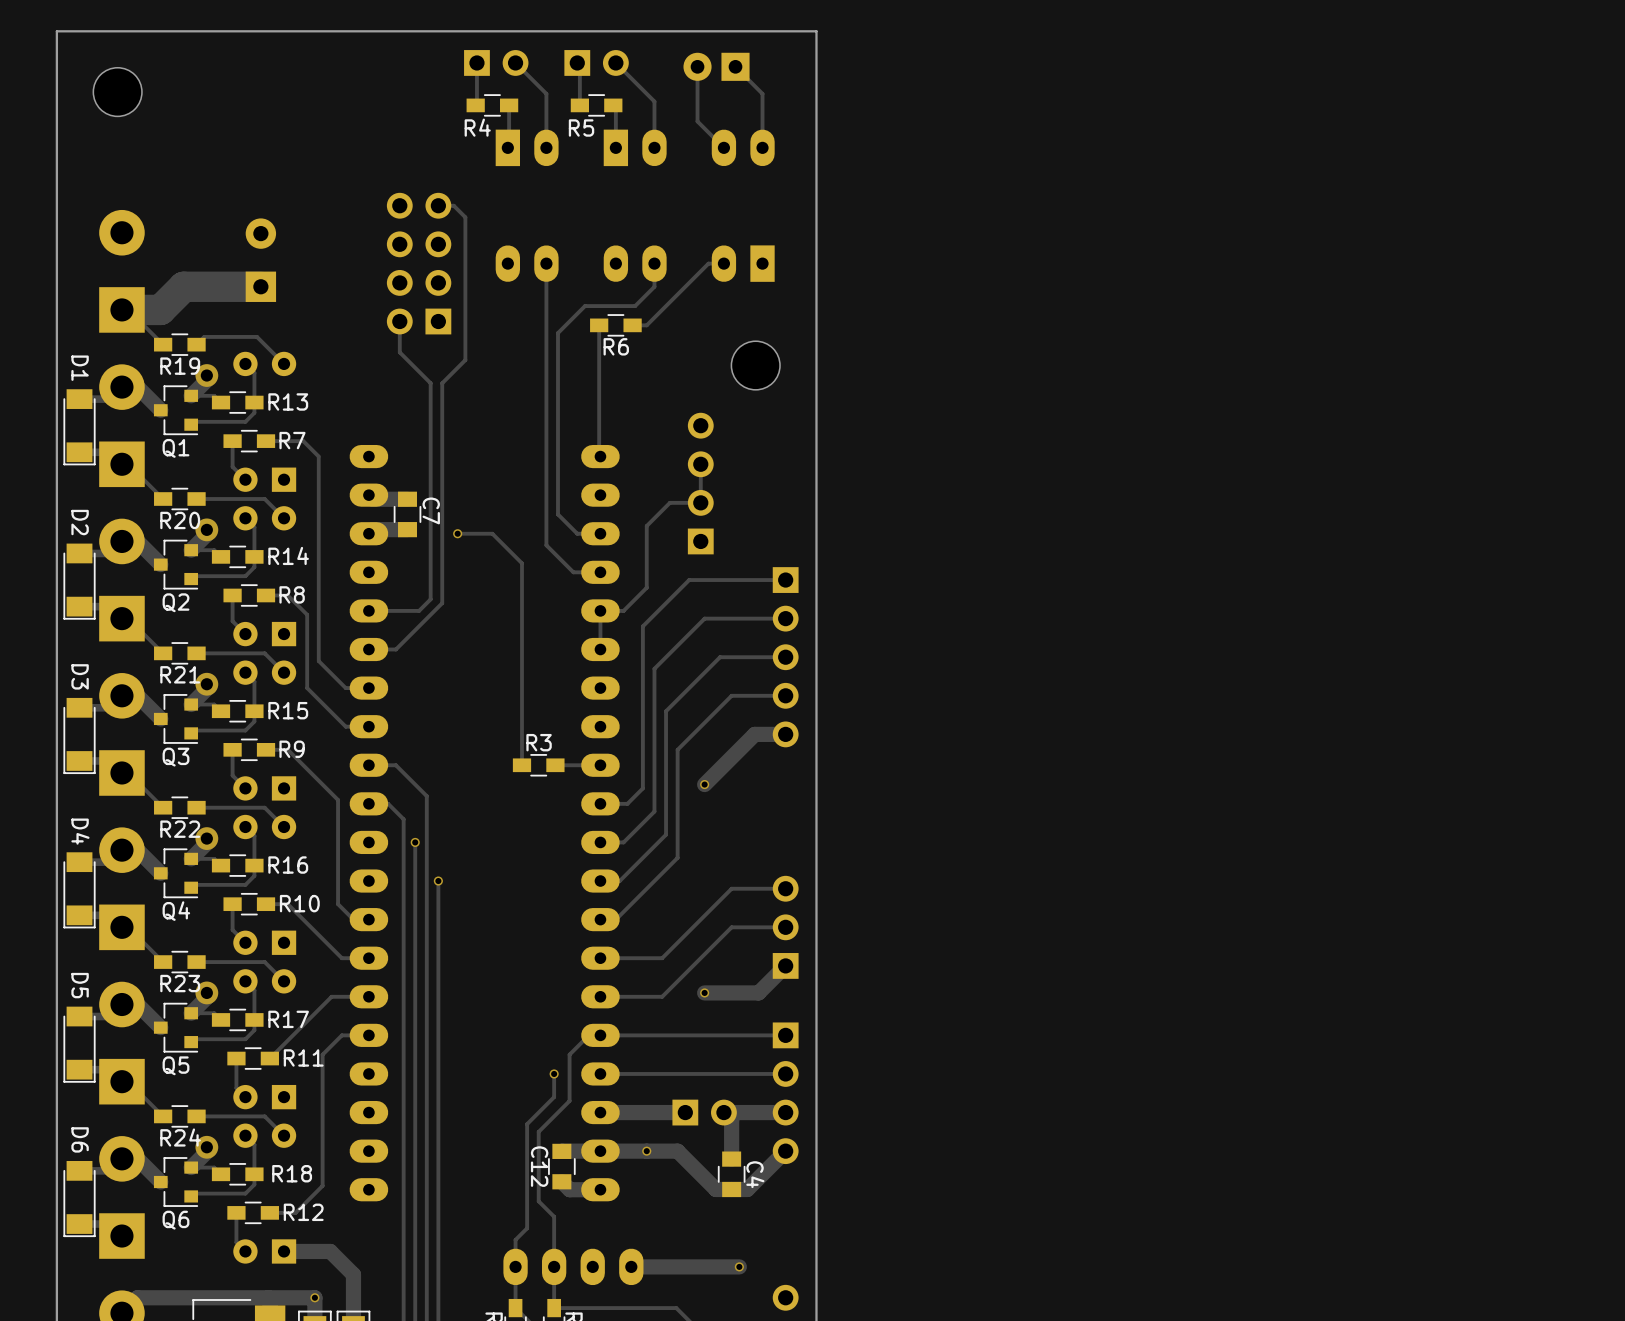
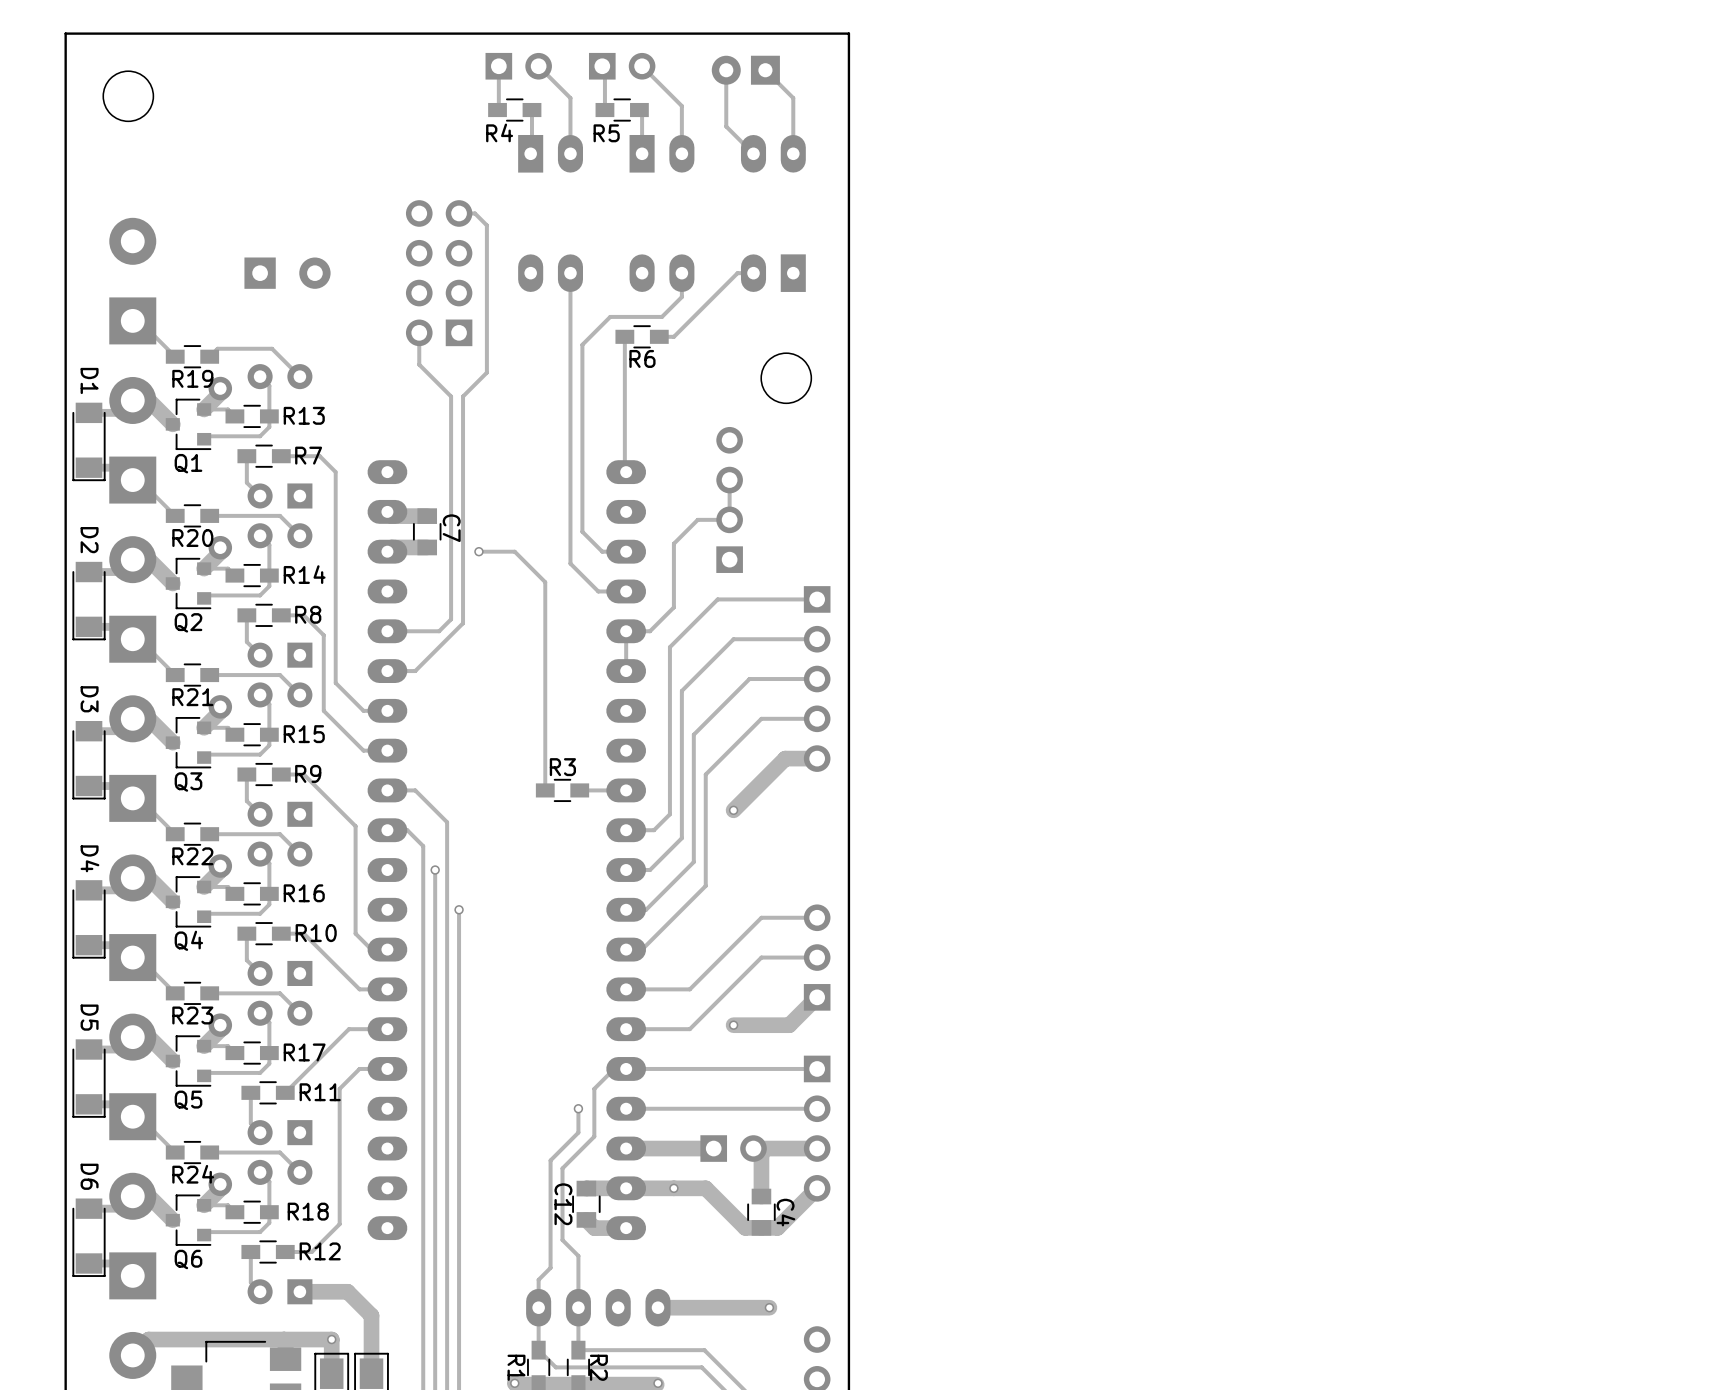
part rotation: 0° (260, 260) -> 90° clockwise (287, 273)
track: (260, 286) (183, 286) (160, 309) (121, 309) -> none

